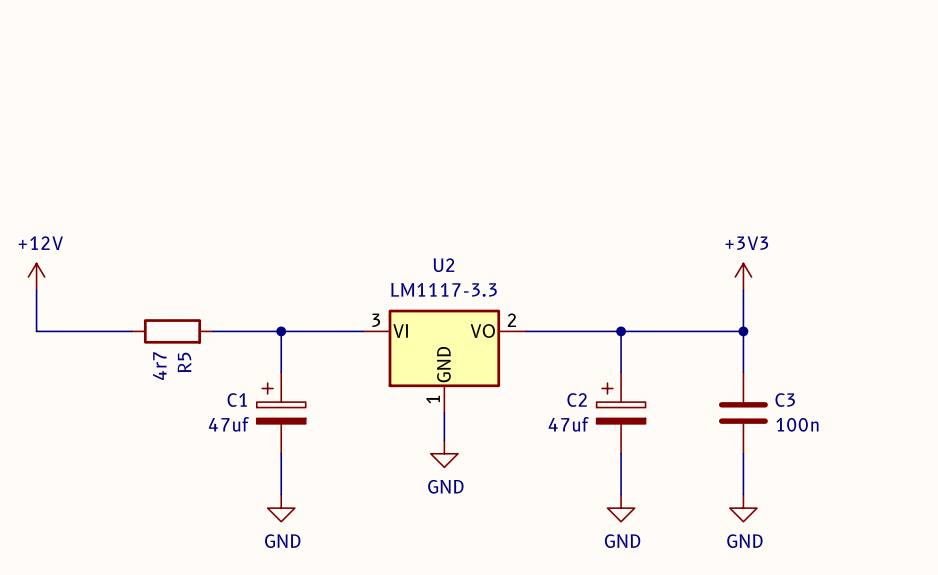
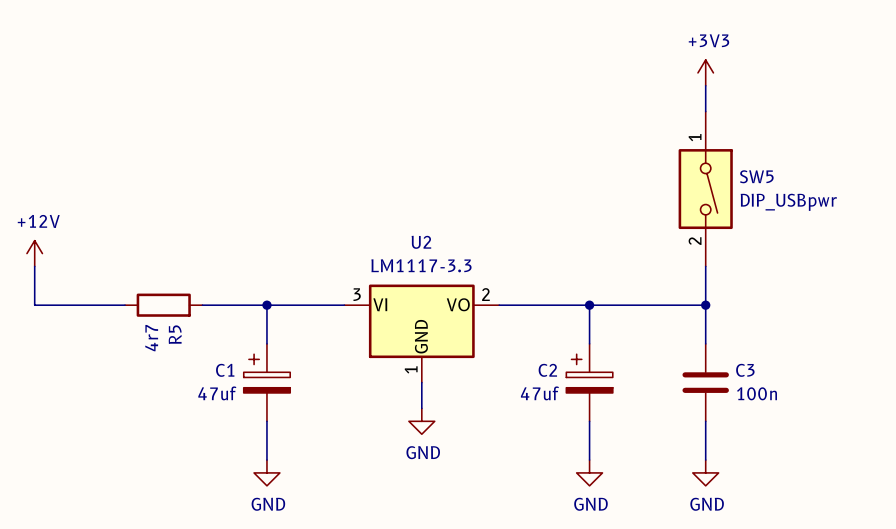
wire: none -> (705, 85) (705, 111)
SW5: none -> DIP_USBpwr (705, 189)
power symbol position: +3V3 (743, 277) -> +3V3 (705, 72)

